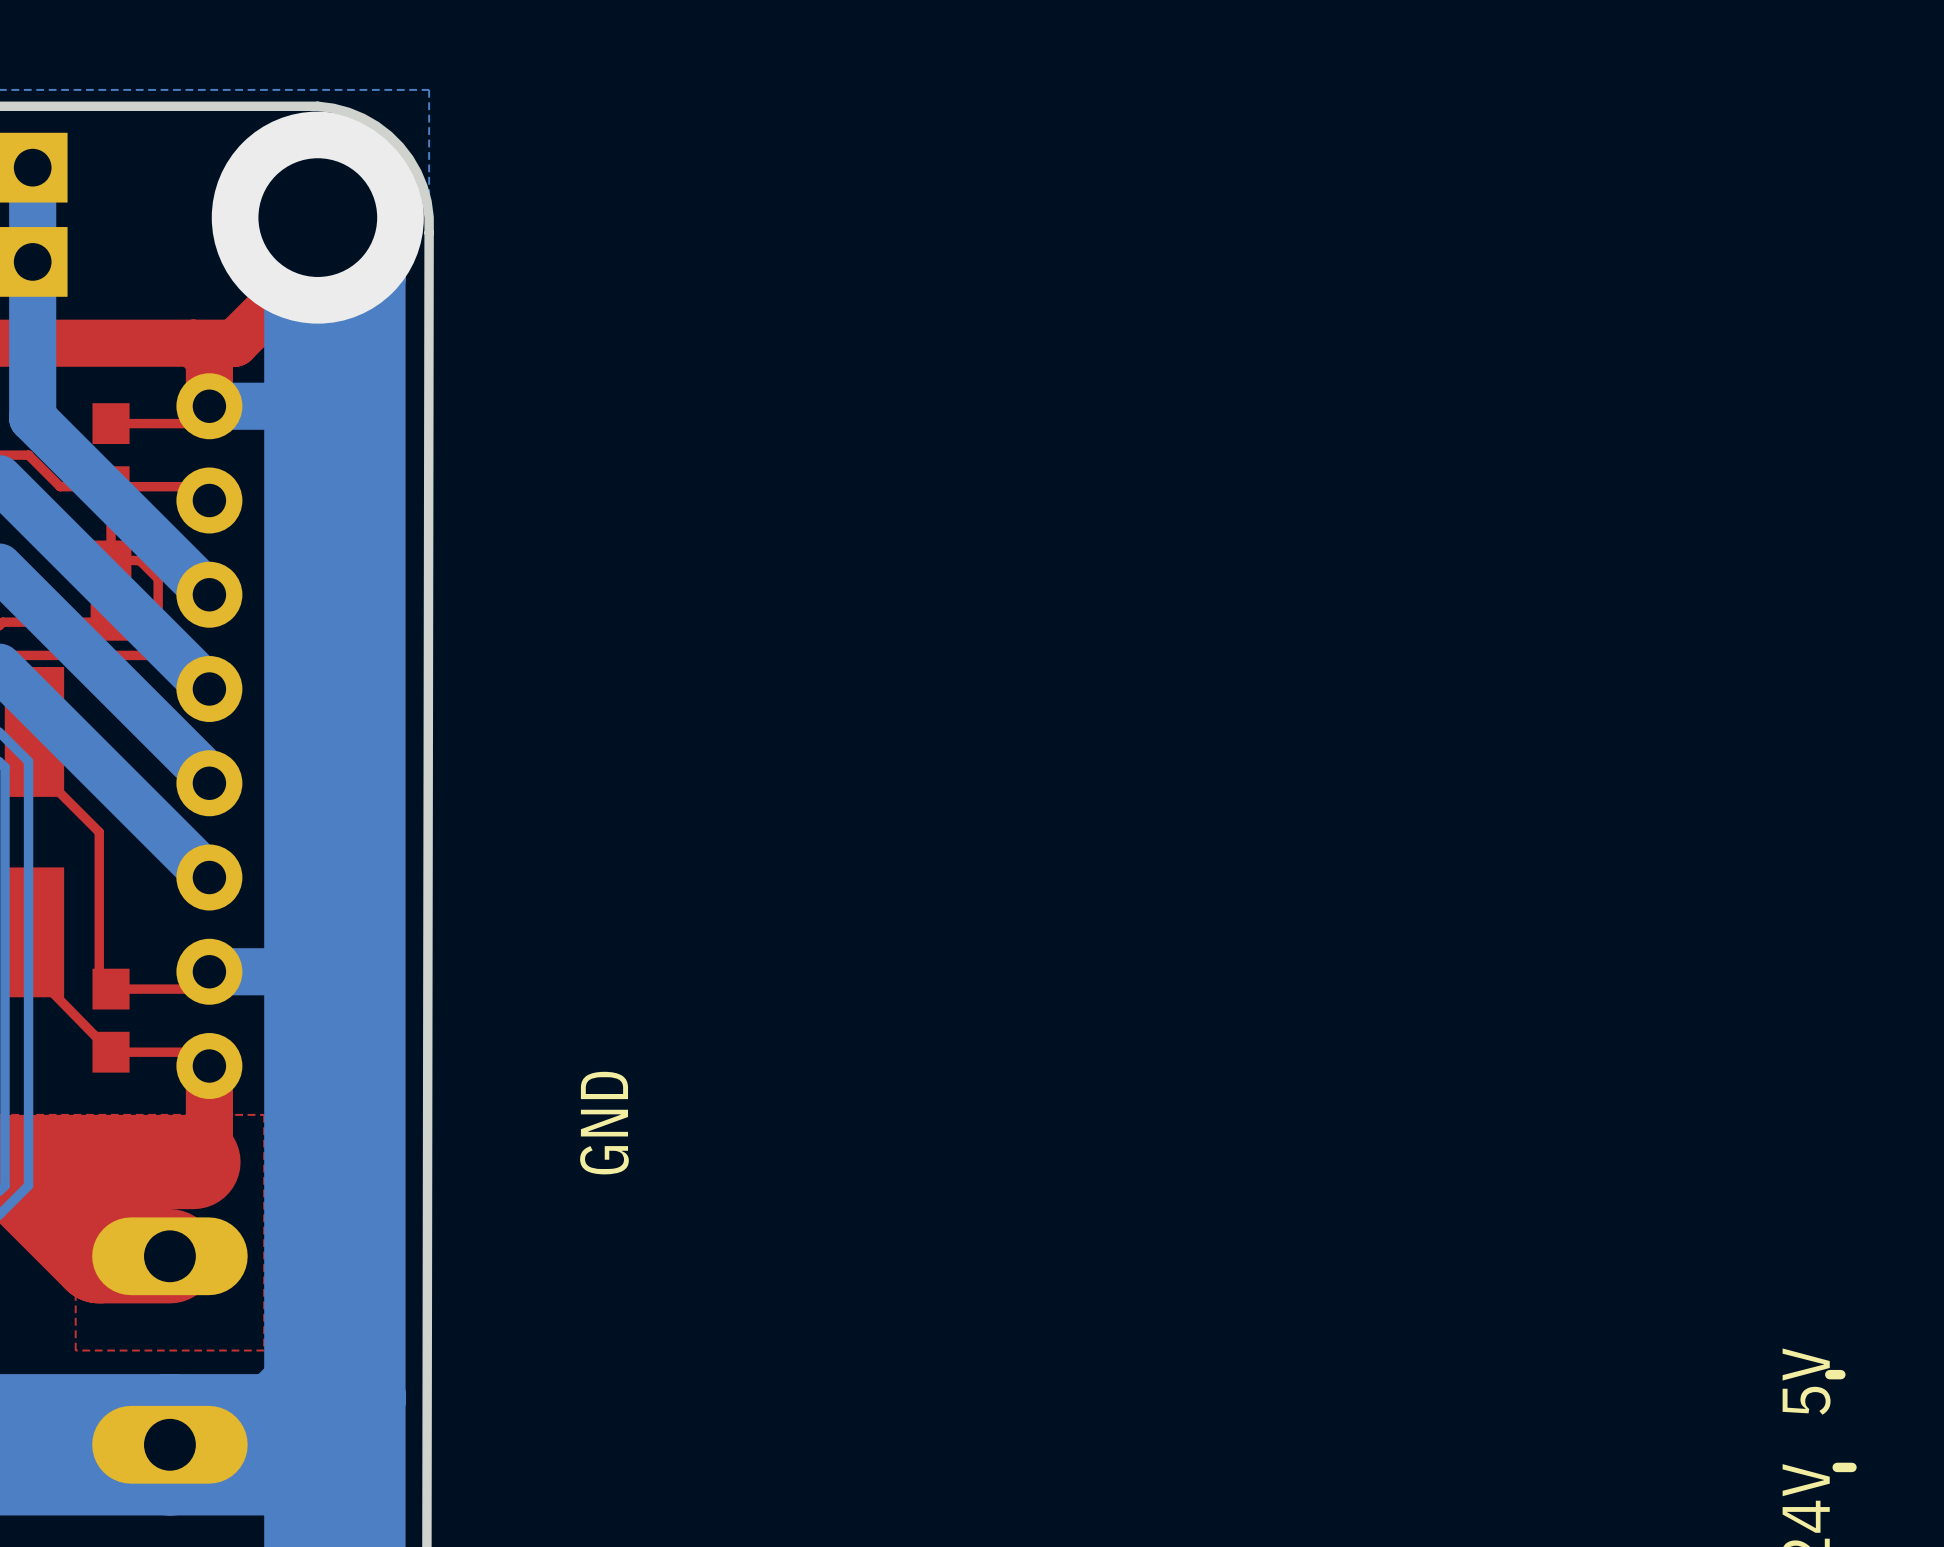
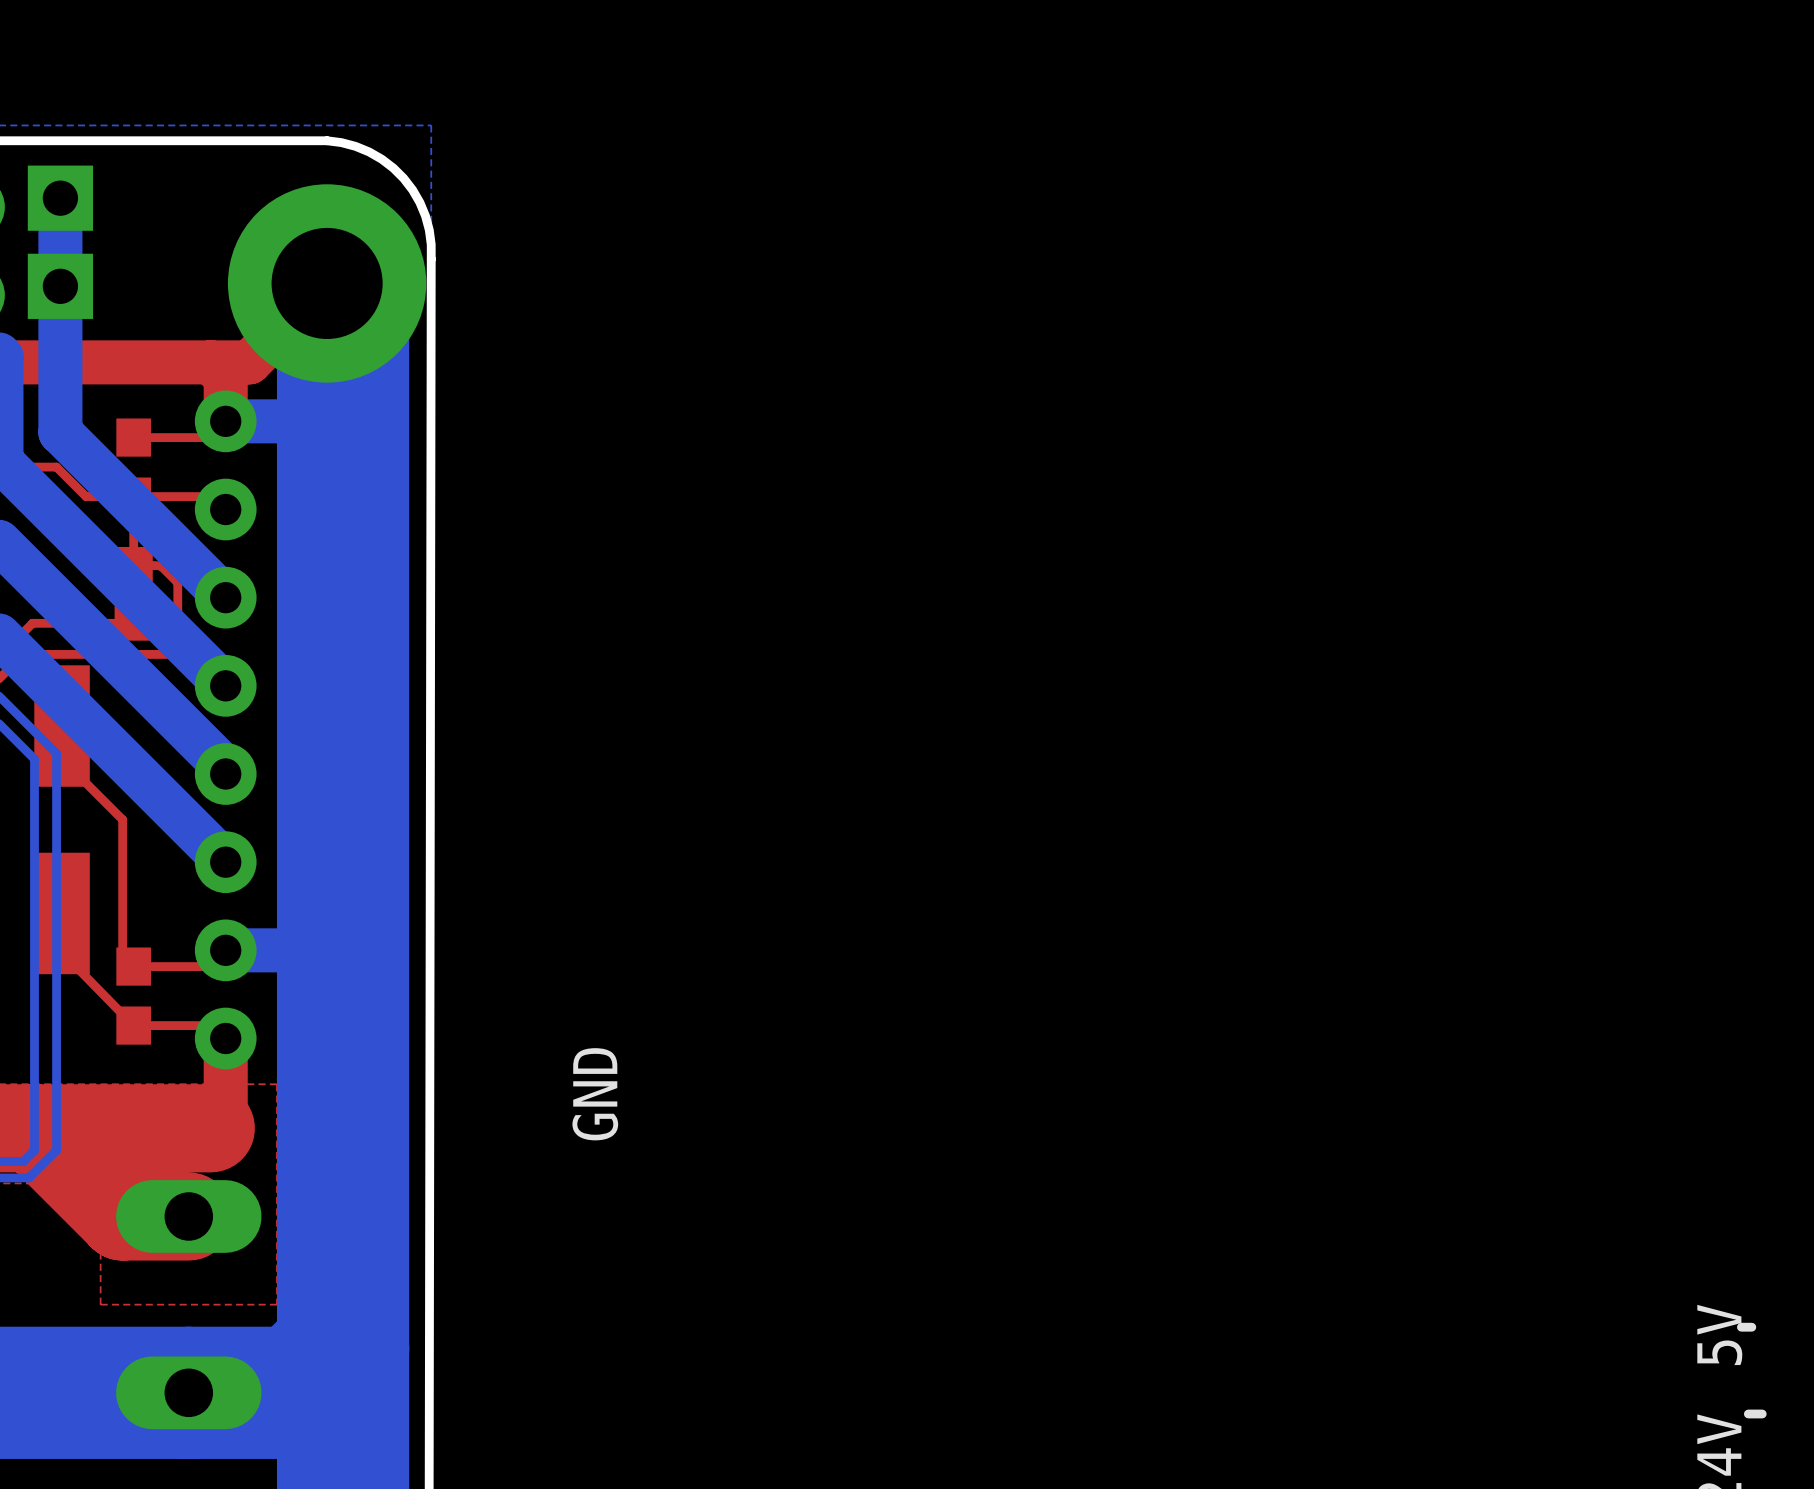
via position: (317, 217) -> (327, 283)

